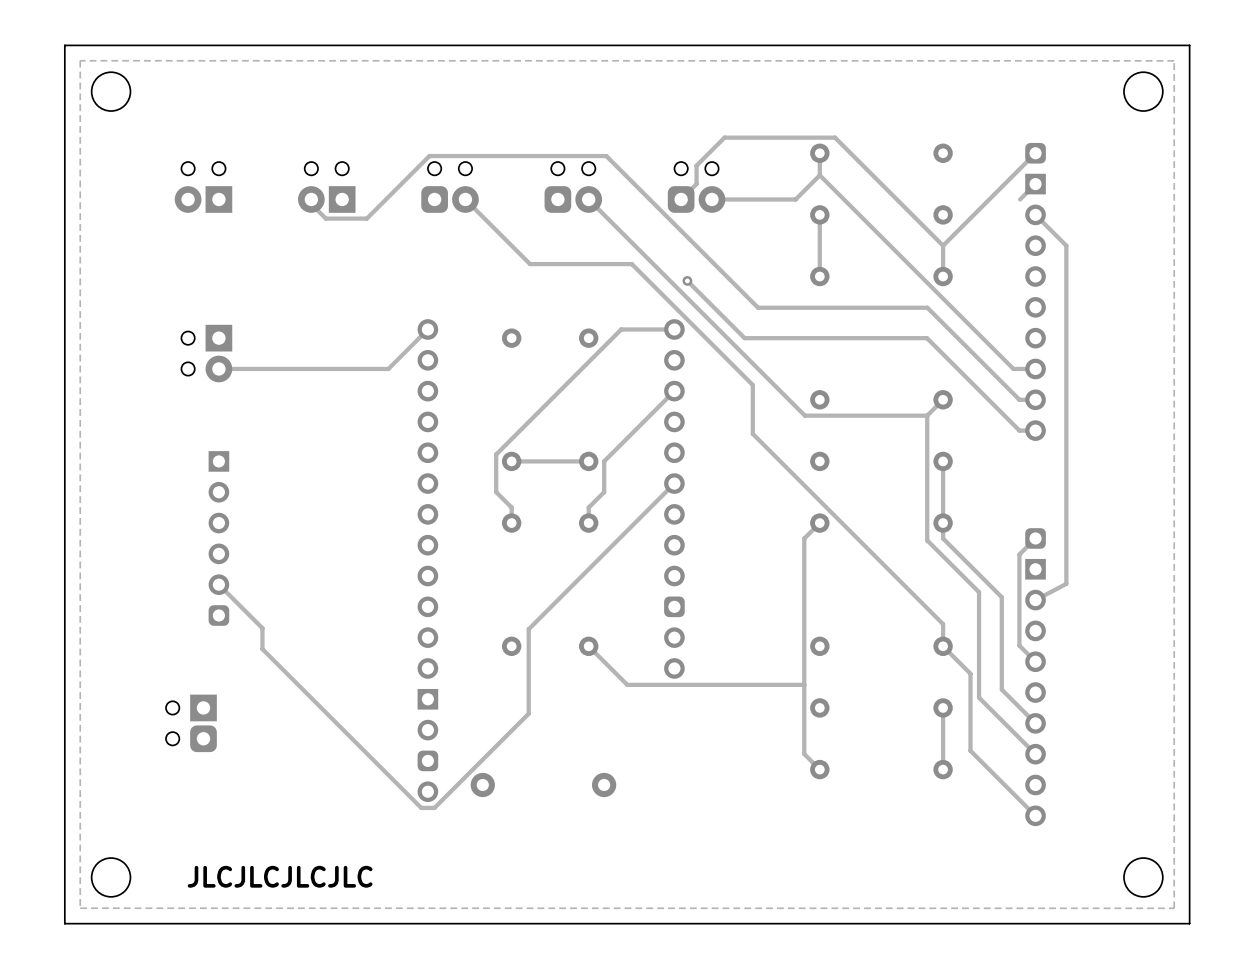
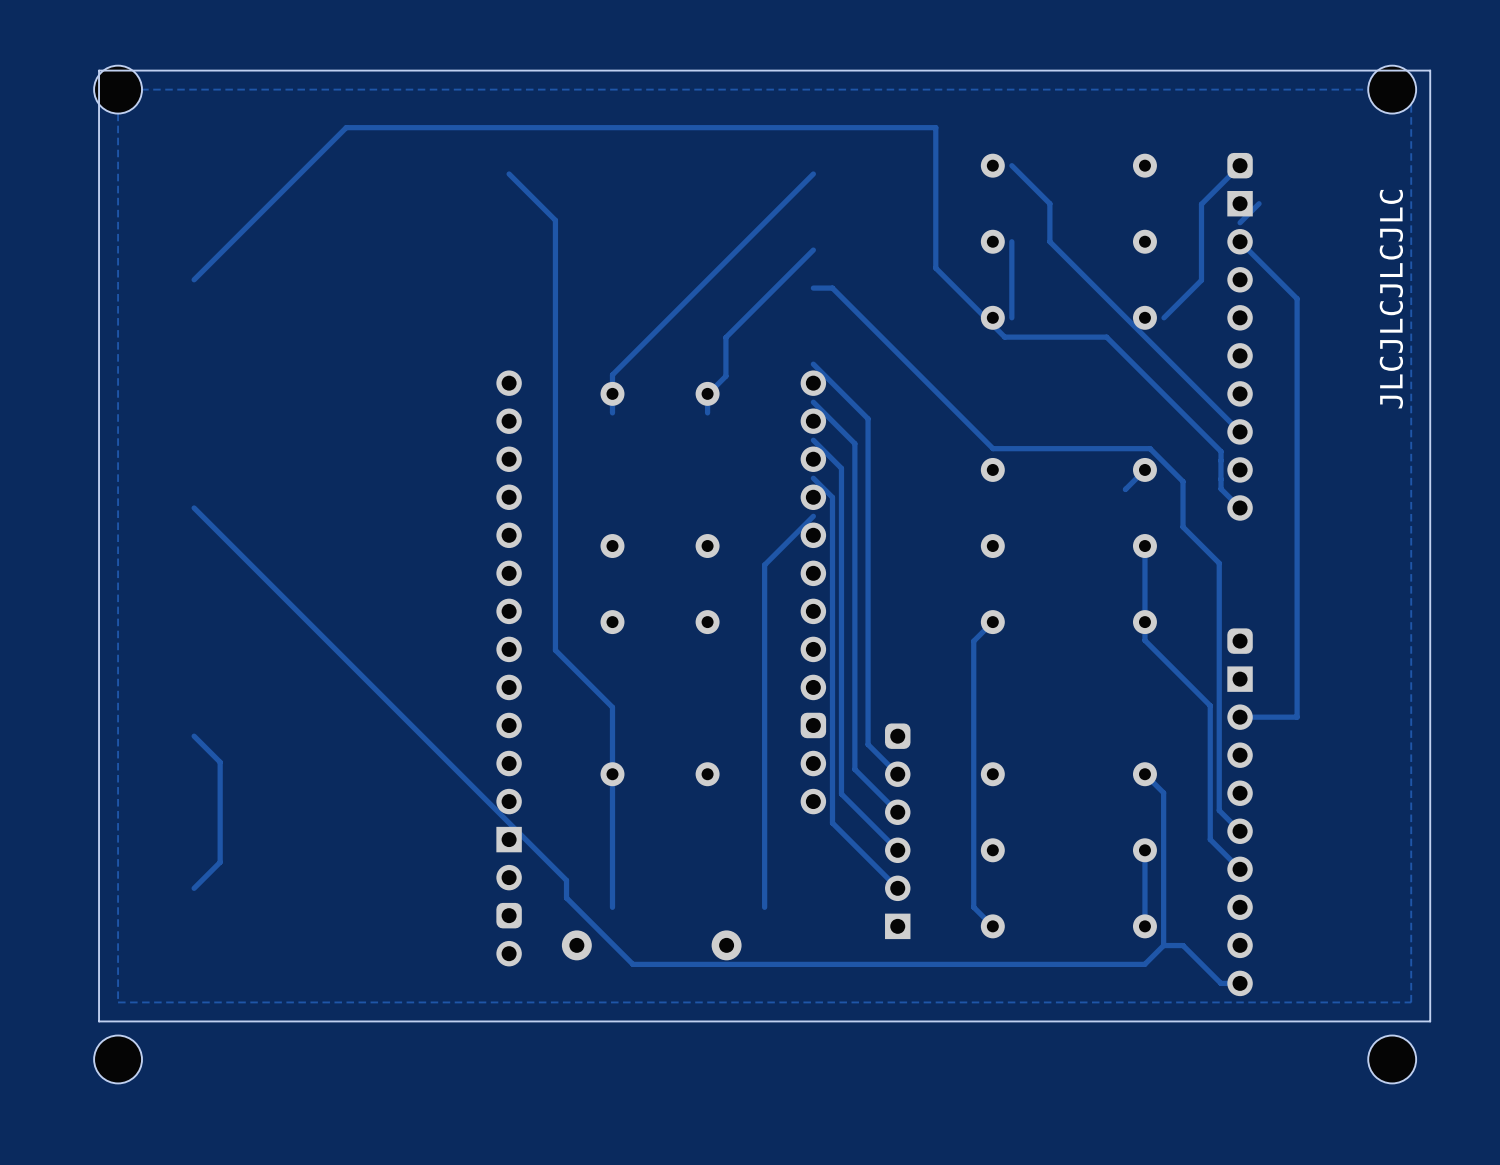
board edge: (1189, 45) (1189, 923) (64, 923) (64, 45) (1189, 45) -> (1430, 70) (1430, 1021) (99, 1021) (99, 70) (1430, 70)
zone outline: (1174, 60) (1174, 908) (80, 908) (80, 60) (1174, 60) -> (1411, 89) (1411, 1002) (118, 1002) (118, 89) (1411, 89)
track: (819, 153) (819, 175) -> none
track: none -> (1011, 165) (1049, 203) (1049, 241) (1240, 431)
track: none -> (1240, 165) (1201, 204) (1201, 280) (1163, 317)
track: (1035, 153) (943, 245) -> none
track: none -> (509, 173) (555, 220) (555, 650) (612, 707) (612, 907)
track: none -> (813, 173) (612, 374) (612, 412)
track: (819, 175) (1013, 368) (1035, 368) -> none
track: (819, 175) (795, 199) (711, 199) -> none
part: (203, 187) -> none
part: (326, 187) -> none
part: (450, 187) -> none
part: (573, 187) -> none
part: (696, 187) -> none
track: (311, 199) (311, 204) (325, 218) (366, 218) (429, 156) (606, 156) (758, 307) (927, 307) (1019, 399) (1035, 399) -> none
track: (465, 199) (530, 264) (631, 264) (752, 385) (752, 433) (943, 624) (943, 646) -> none
track: (588, 199) (804, 415) (927, 415) (927, 540) (979, 592) (979, 697) (1035, 754) -> none
track: (681, 199) (696, 184) (696, 165) (724, 137) (835, 137) (943, 245) -> none
track: (819, 214) (819, 276) -> (1011, 241) (1011, 317)
track: (1035, 214) (1066, 245) (1066, 261) -> (1240, 241) (1297, 298)
track: none -> (813, 250) (725, 337) (725, 376) (707, 394) (707, 412)
track: none -> (194, 279) (346, 127) (935, 127) (935, 268) (1004, 337) (1106, 337) (1221, 451) (1221, 460)
track: (943, 245) (943, 276) -> none
track: none -> (813, 288) (832, 288) (993, 448) (1150, 448) (1183, 481) (1183, 527) (1219, 563) (1219, 810) (1240, 831)
text: none -> JLCJLCJLCJLC (1391, 299)
track: (687, 280) (744, 338) (927, 338) (1019, 430) (1035, 430) -> none
via: (687, 280) -> none
part position: (1035, 291) -> (1240, 336)
track: none -> (813, 364) (868, 418) (868, 744) (897, 774)
track: (427, 329) (388, 368) (218, 368) -> none
track: (674, 329) (621, 329) (496, 454) (496, 492) (511, 507) (511, 523) -> none
track: none -> (813, 402) (854, 443) (854, 769) (897, 812)
part: (206, 353) -> none
track: none -> (813, 440) (841, 468) (841, 794) (897, 850)
track: (674, 391) (604, 461) (604, 492) (588, 507) (588, 523) -> none
track: none -> (1220, 460) (1220, 479)
track: none -> (813, 478) (832, 497) (832, 823) (897, 888)
track: none -> (1221, 479) (1221, 488) (1240, 507)
track: none -> (194, 507) (566, 880) (566, 897) (632, 964) (1144, 964) (1163, 945)
track: none -> (813, 516) (764, 565) (764, 907)
track: (588, 461) (511, 461) -> none
track: (674, 483) (528, 629) (528, 713) (434, 807) (421, 807) (262, 649) (262, 628) (218, 584) -> none
track: (943, 537) (1001, 597) (1001, 689) (1035, 723) -> (1144, 640) (1210, 705) (1210, 839) (1240, 869)
part: (218, 538) -> none
track: (1035, 538) (1019, 554) (1019, 645) (1035, 661) -> none
track: (1066, 583) (1035, 600) -> (1297, 697) (1297, 717) (1240, 717)
track: none -> (194, 736) (220, 762) (220, 862) (194, 888)
track: (588, 646) (627, 684) (804, 684) -> none
track: (958, 661) (970, 673) (970, 750) (1035, 815) -> (1163, 792) (1163, 945)
part position: (1035, 677) -> (1240, 812)
part: none -> (897, 831)
part: (191, 723) -> none
track: none -> (1163, 945) (1183, 945) (1220, 983) (1240, 983)
text: JLCJLCJLCJLC (280, 876) -> none

